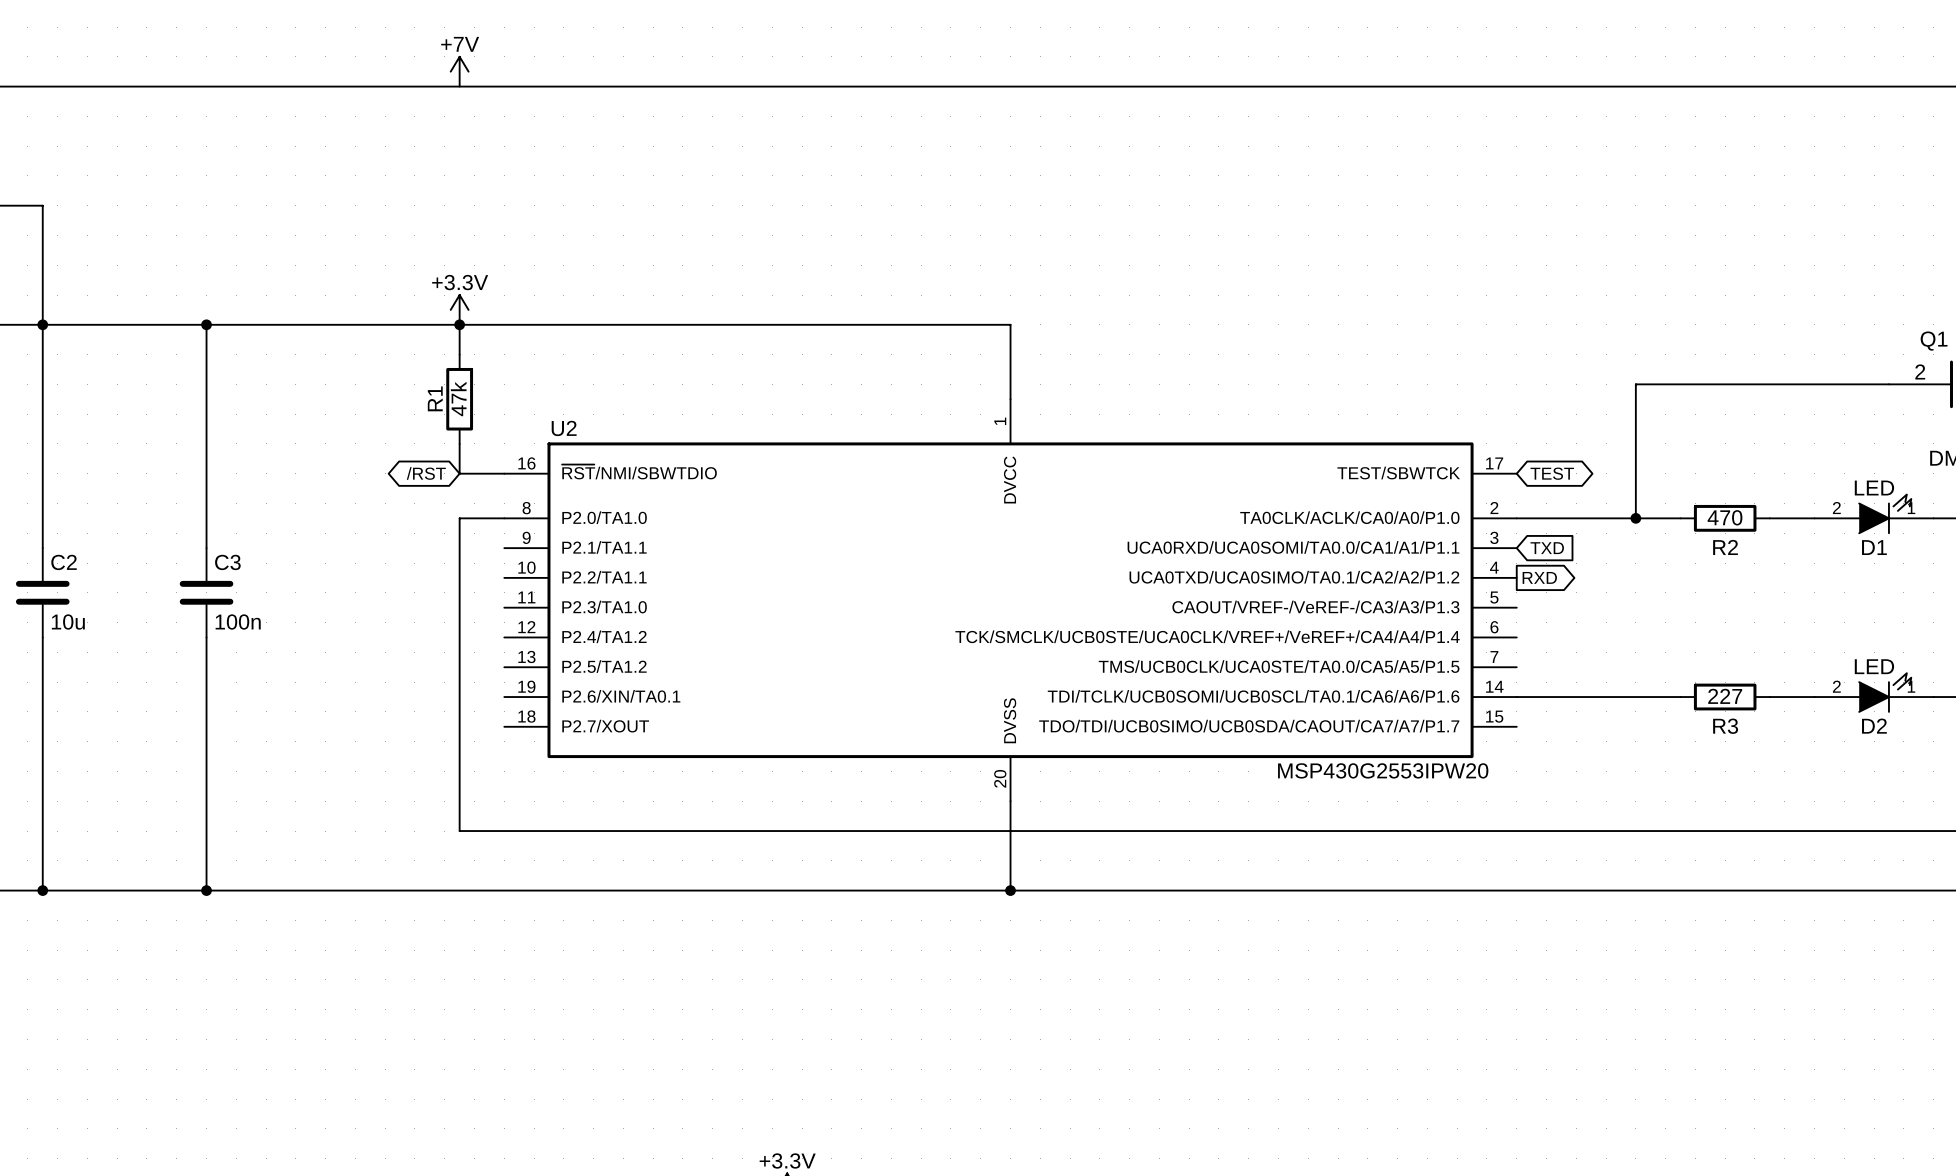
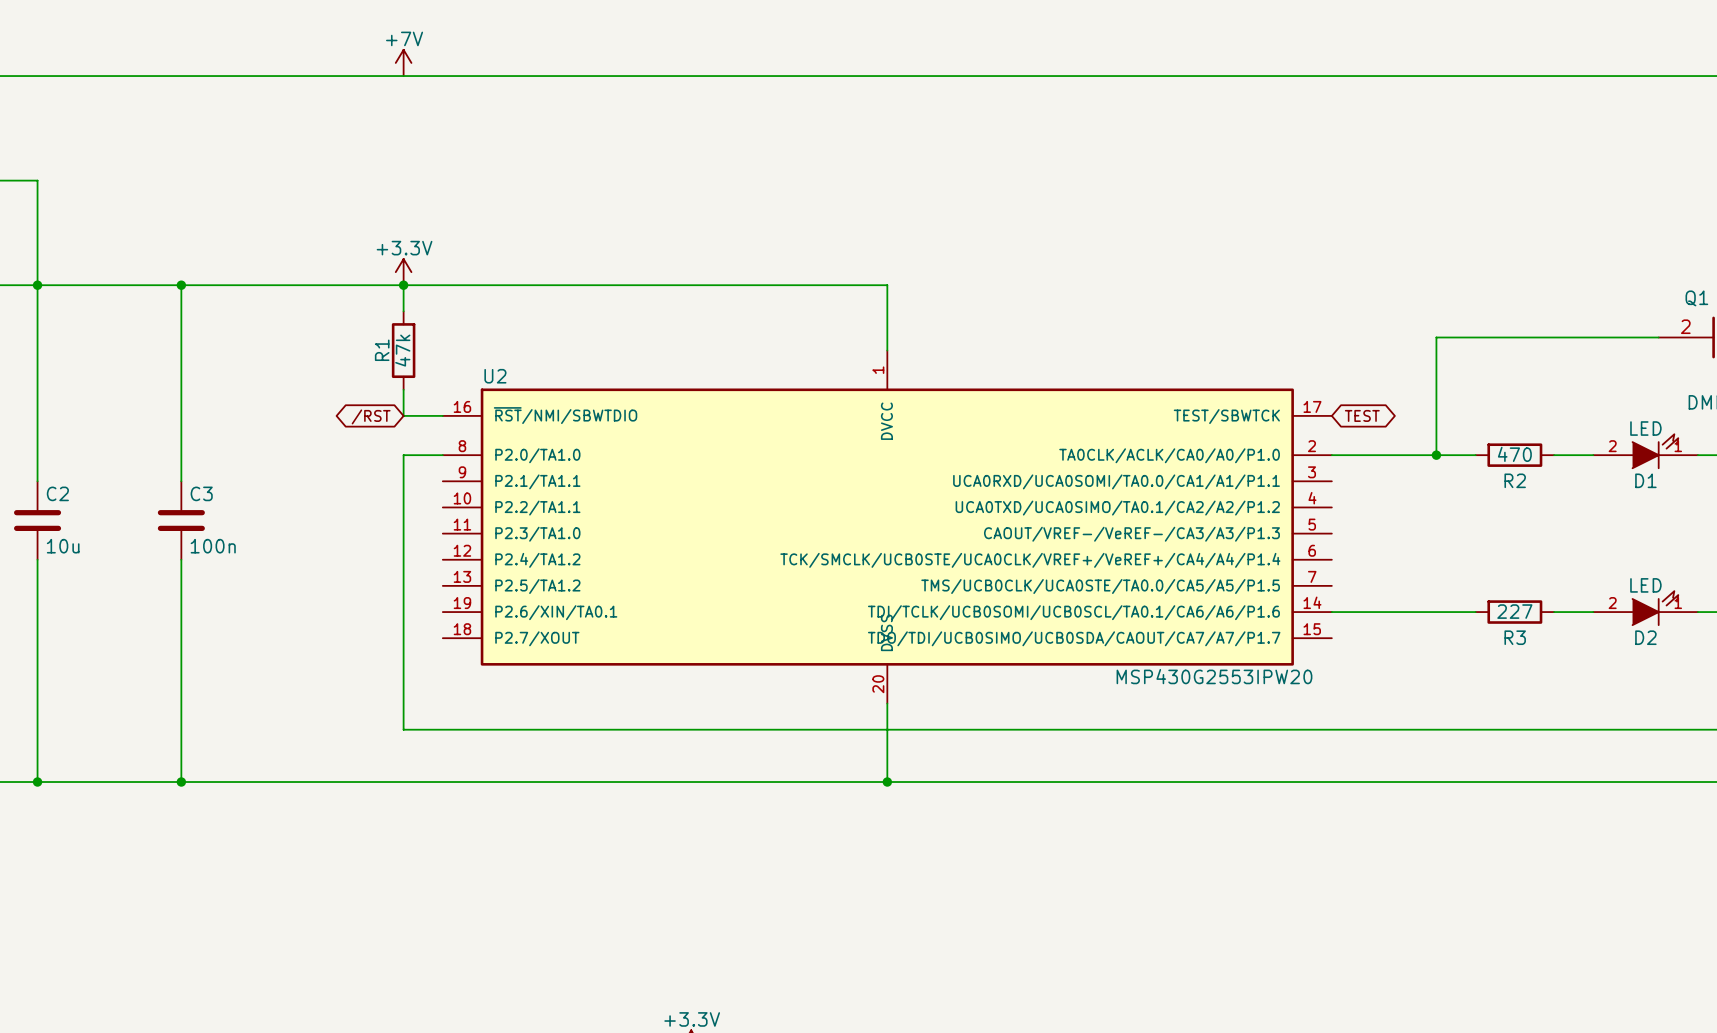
global label: TXD (1547, 548) -> none
global label: RXD (1539, 577) -> none

